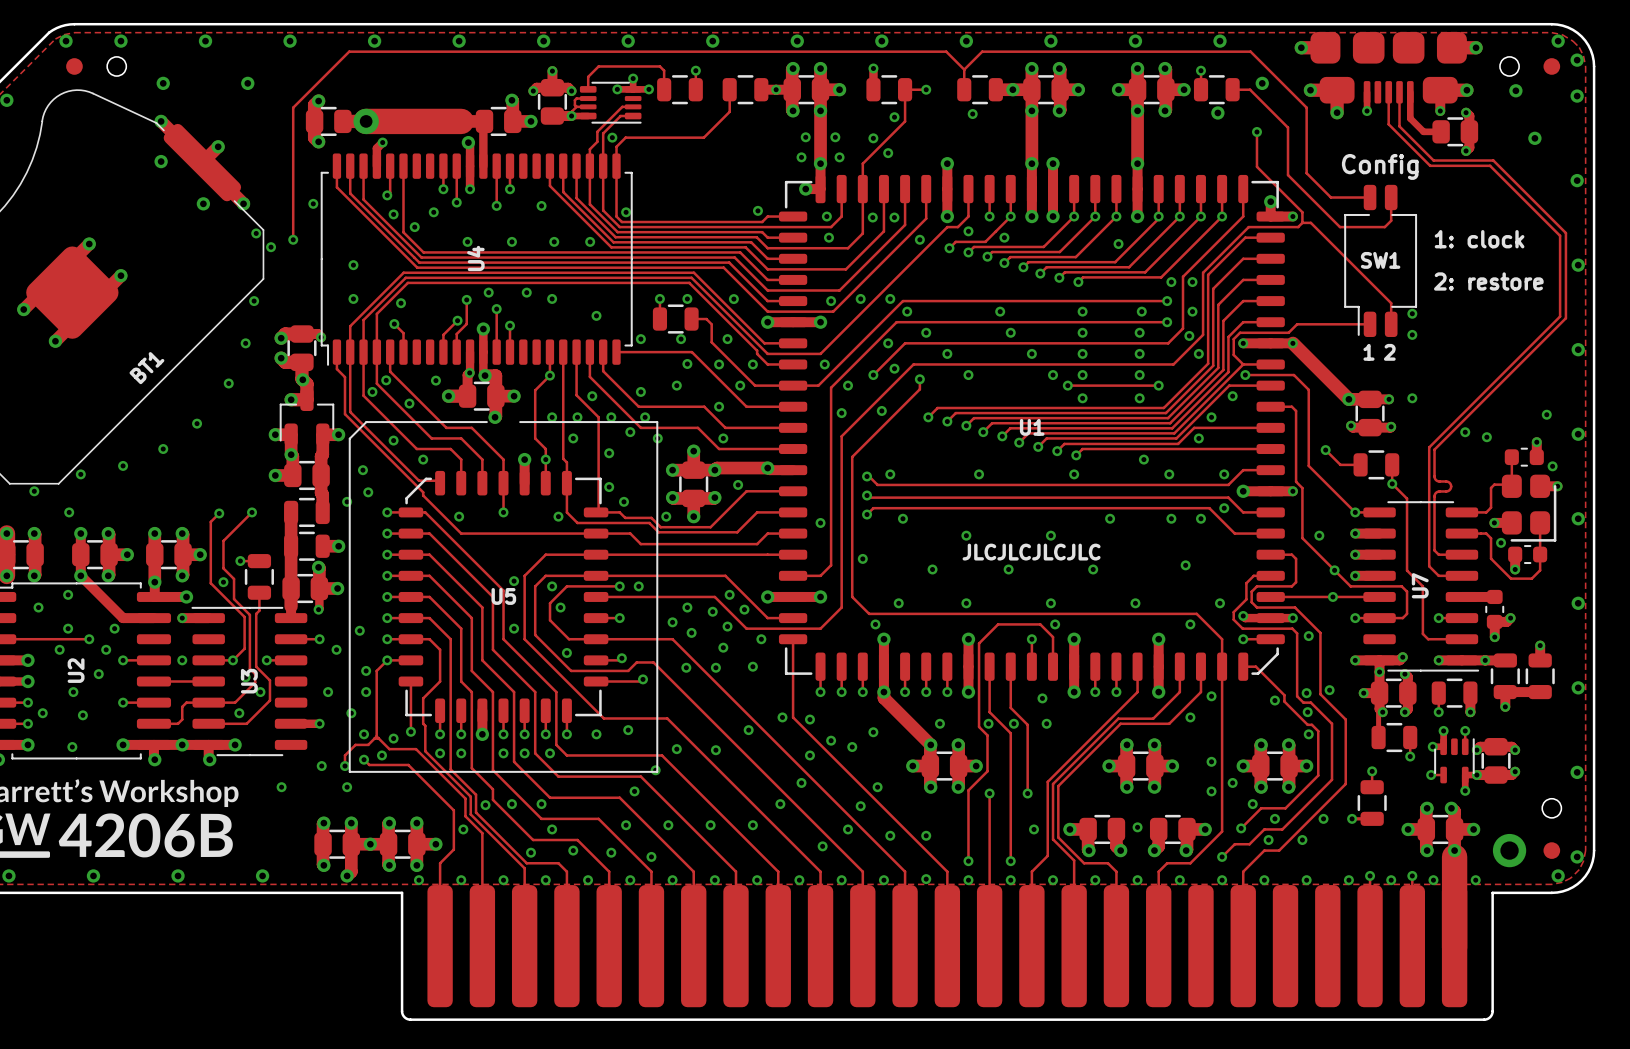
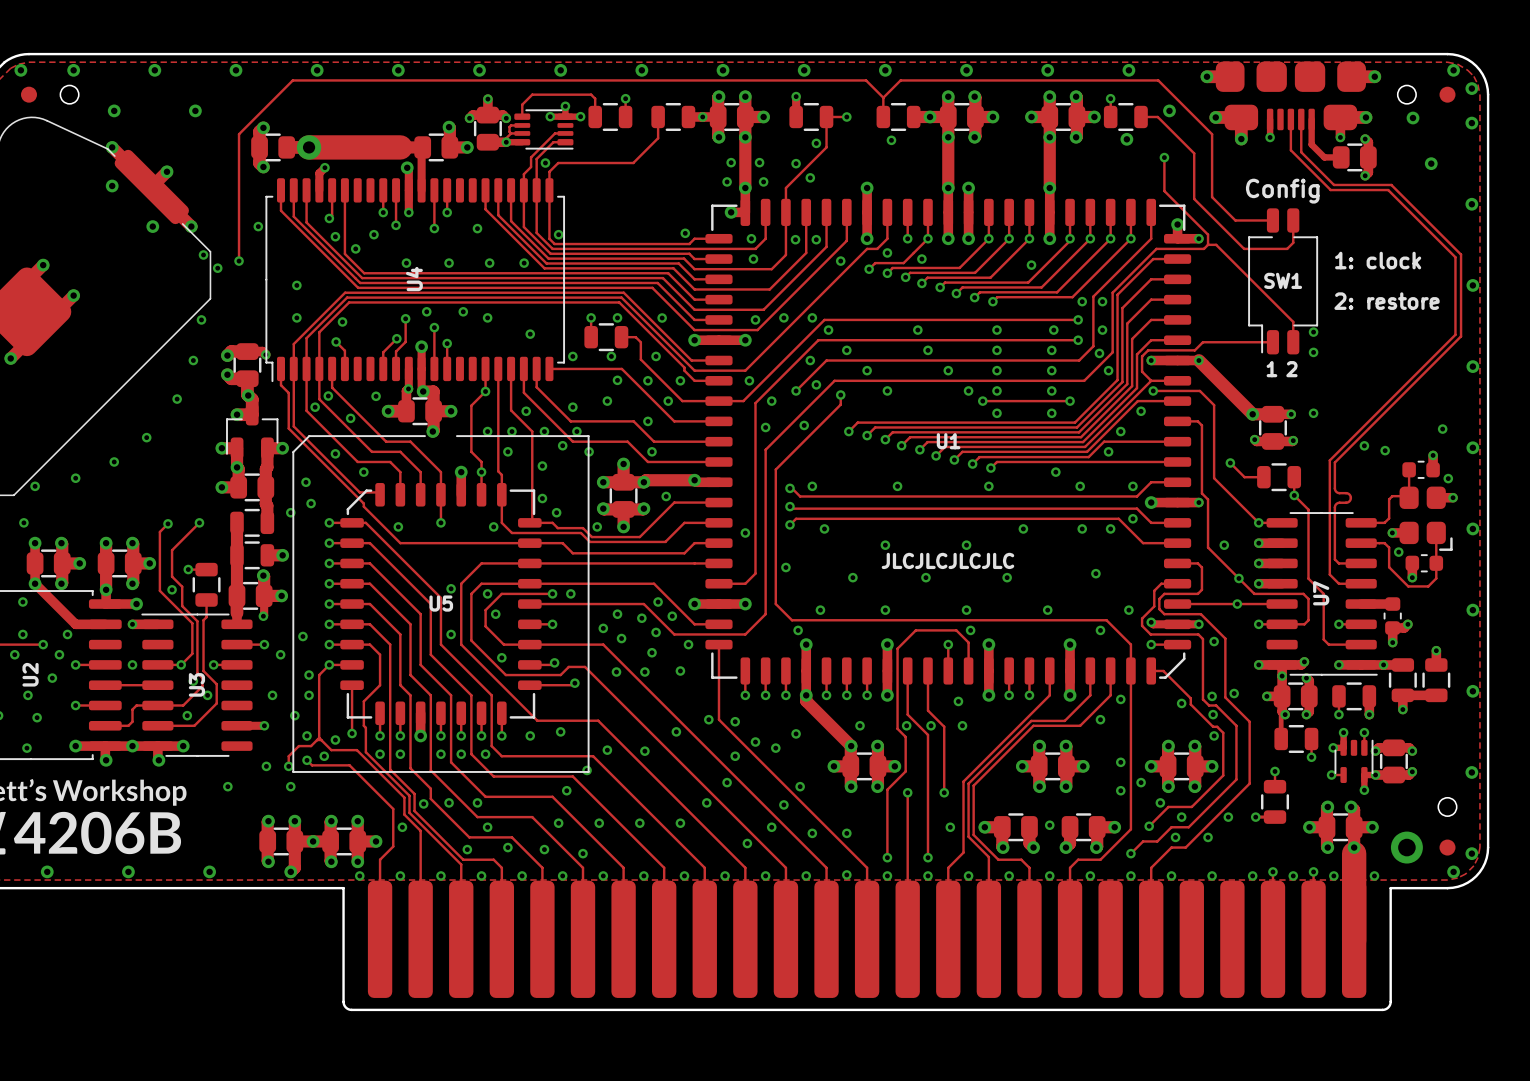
BT1 name: BT1 (146, 368) -> none
part footprint: [1501, 474, 1557, 542] -> [1399, 486, 1453, 551]

